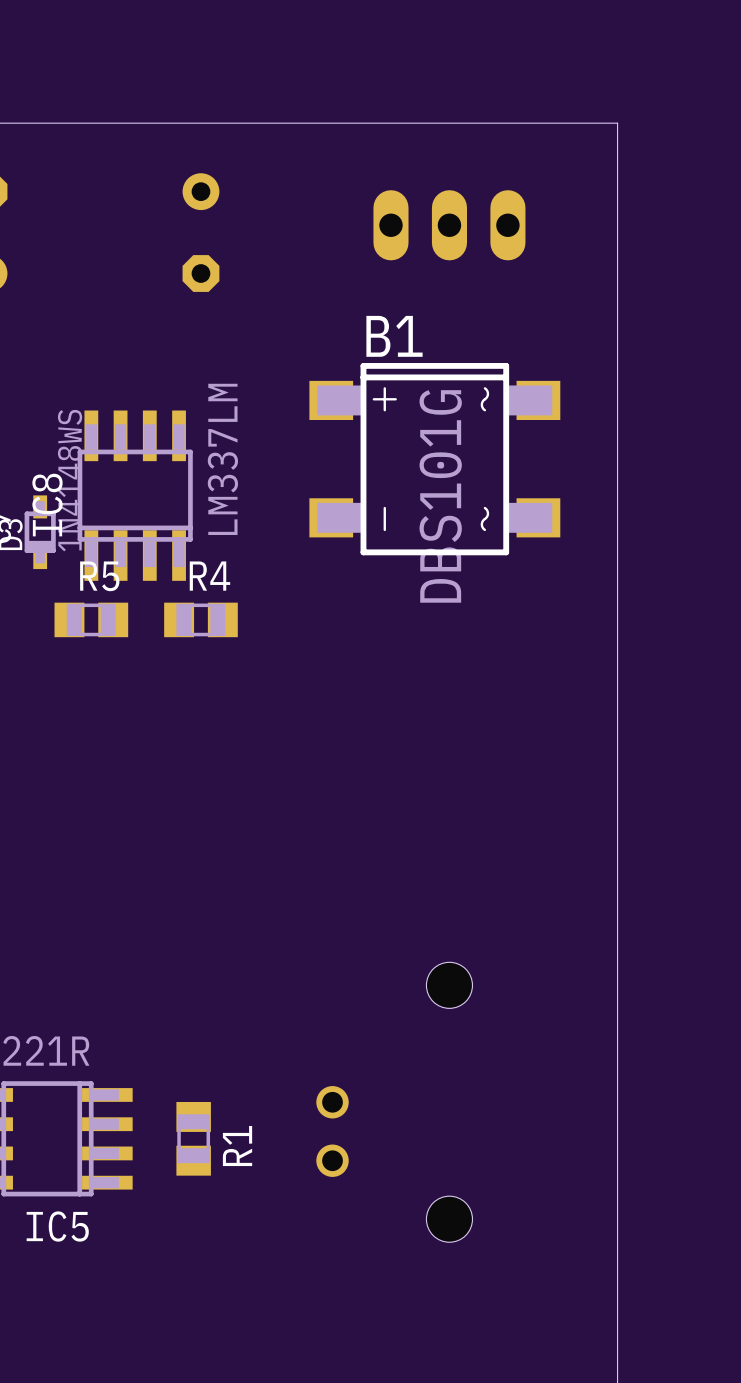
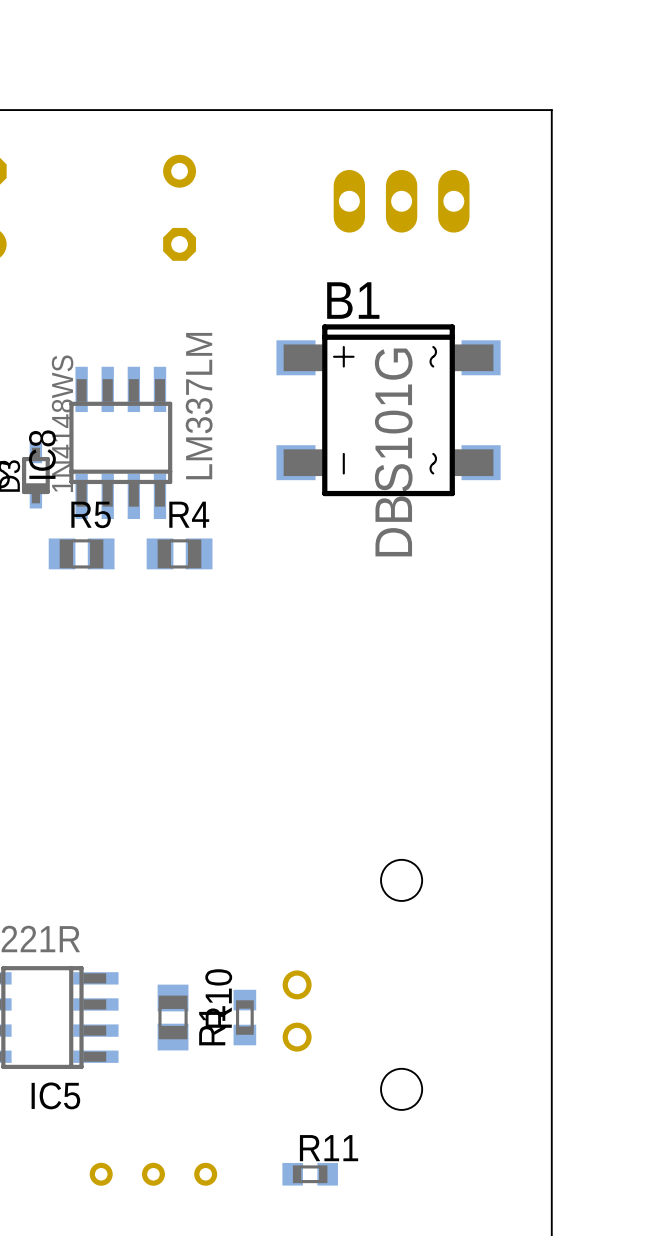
R10: none -> (244, 1017)
part: none -> (153, 1174)
R11: none -> (310, 1174)

